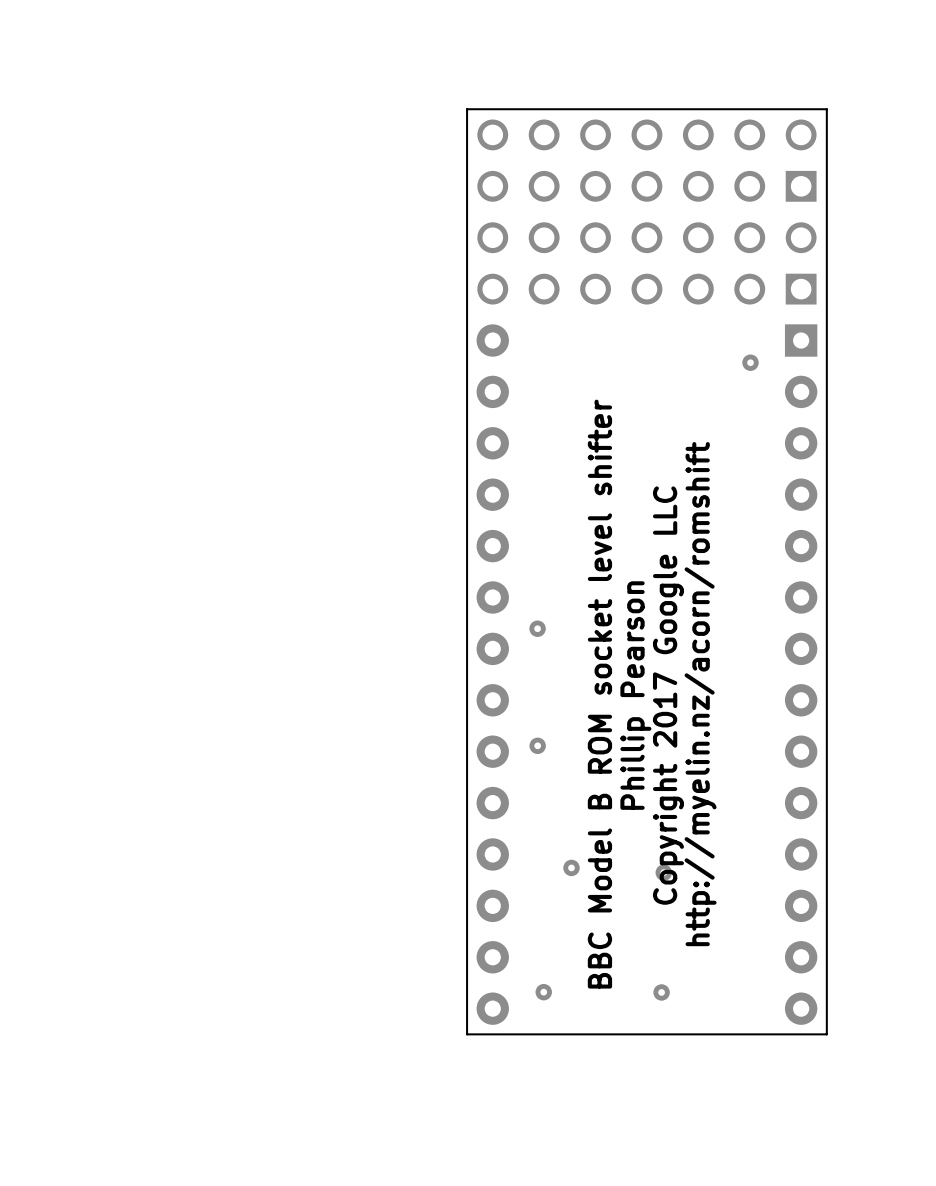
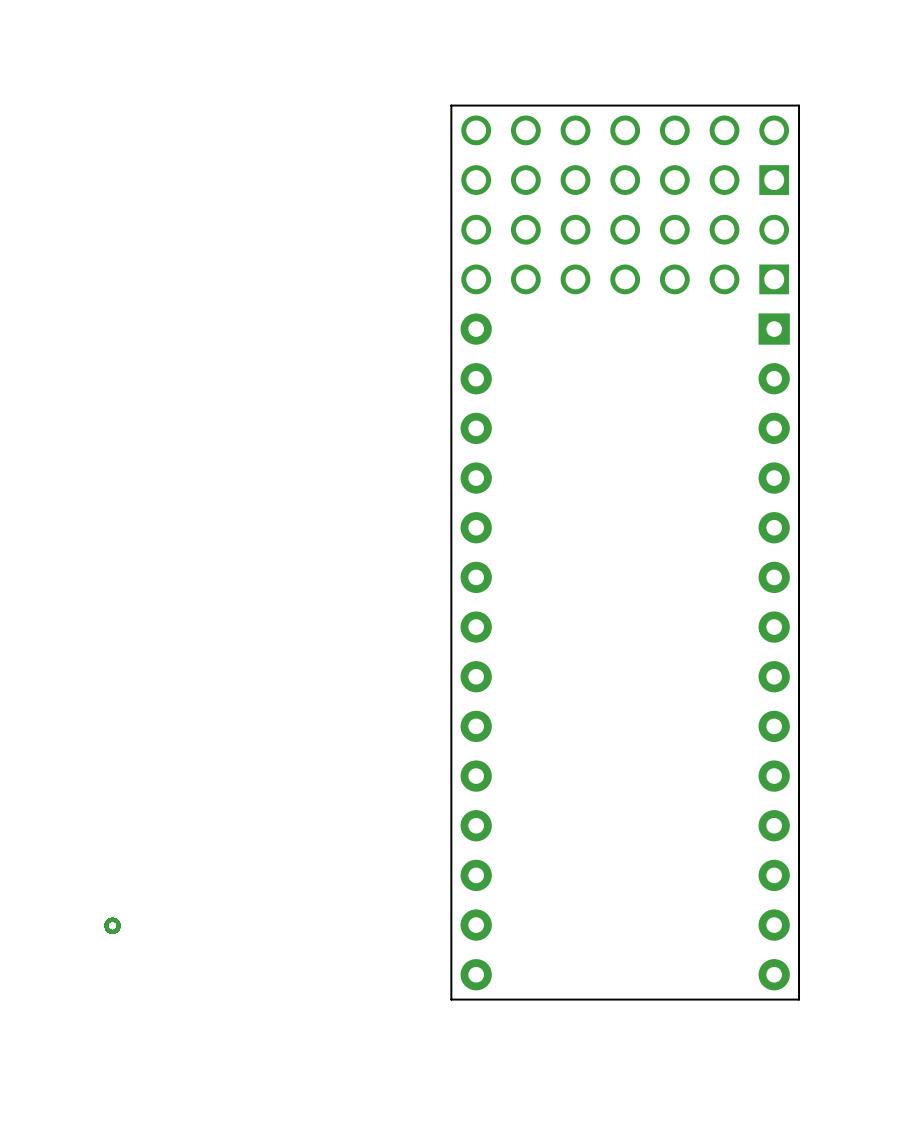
part: (750, 362) -> none
part: (537, 628) -> none
text: BBC Model B ROM socket level shifter (599, 694) -> none
text: http://myelin.nz/acorn/romshift (700, 694) -> none
text: Phillip Pearson (635, 695) -> none
text: Copyright 2017 Google LLC (668, 695) -> none
part: (537, 745) -> none
part: (571, 867) -> none
part: (663, 872) -> none
part: none -> (112, 925)
part: (543, 992) -> none
part: (661, 992) -> none

